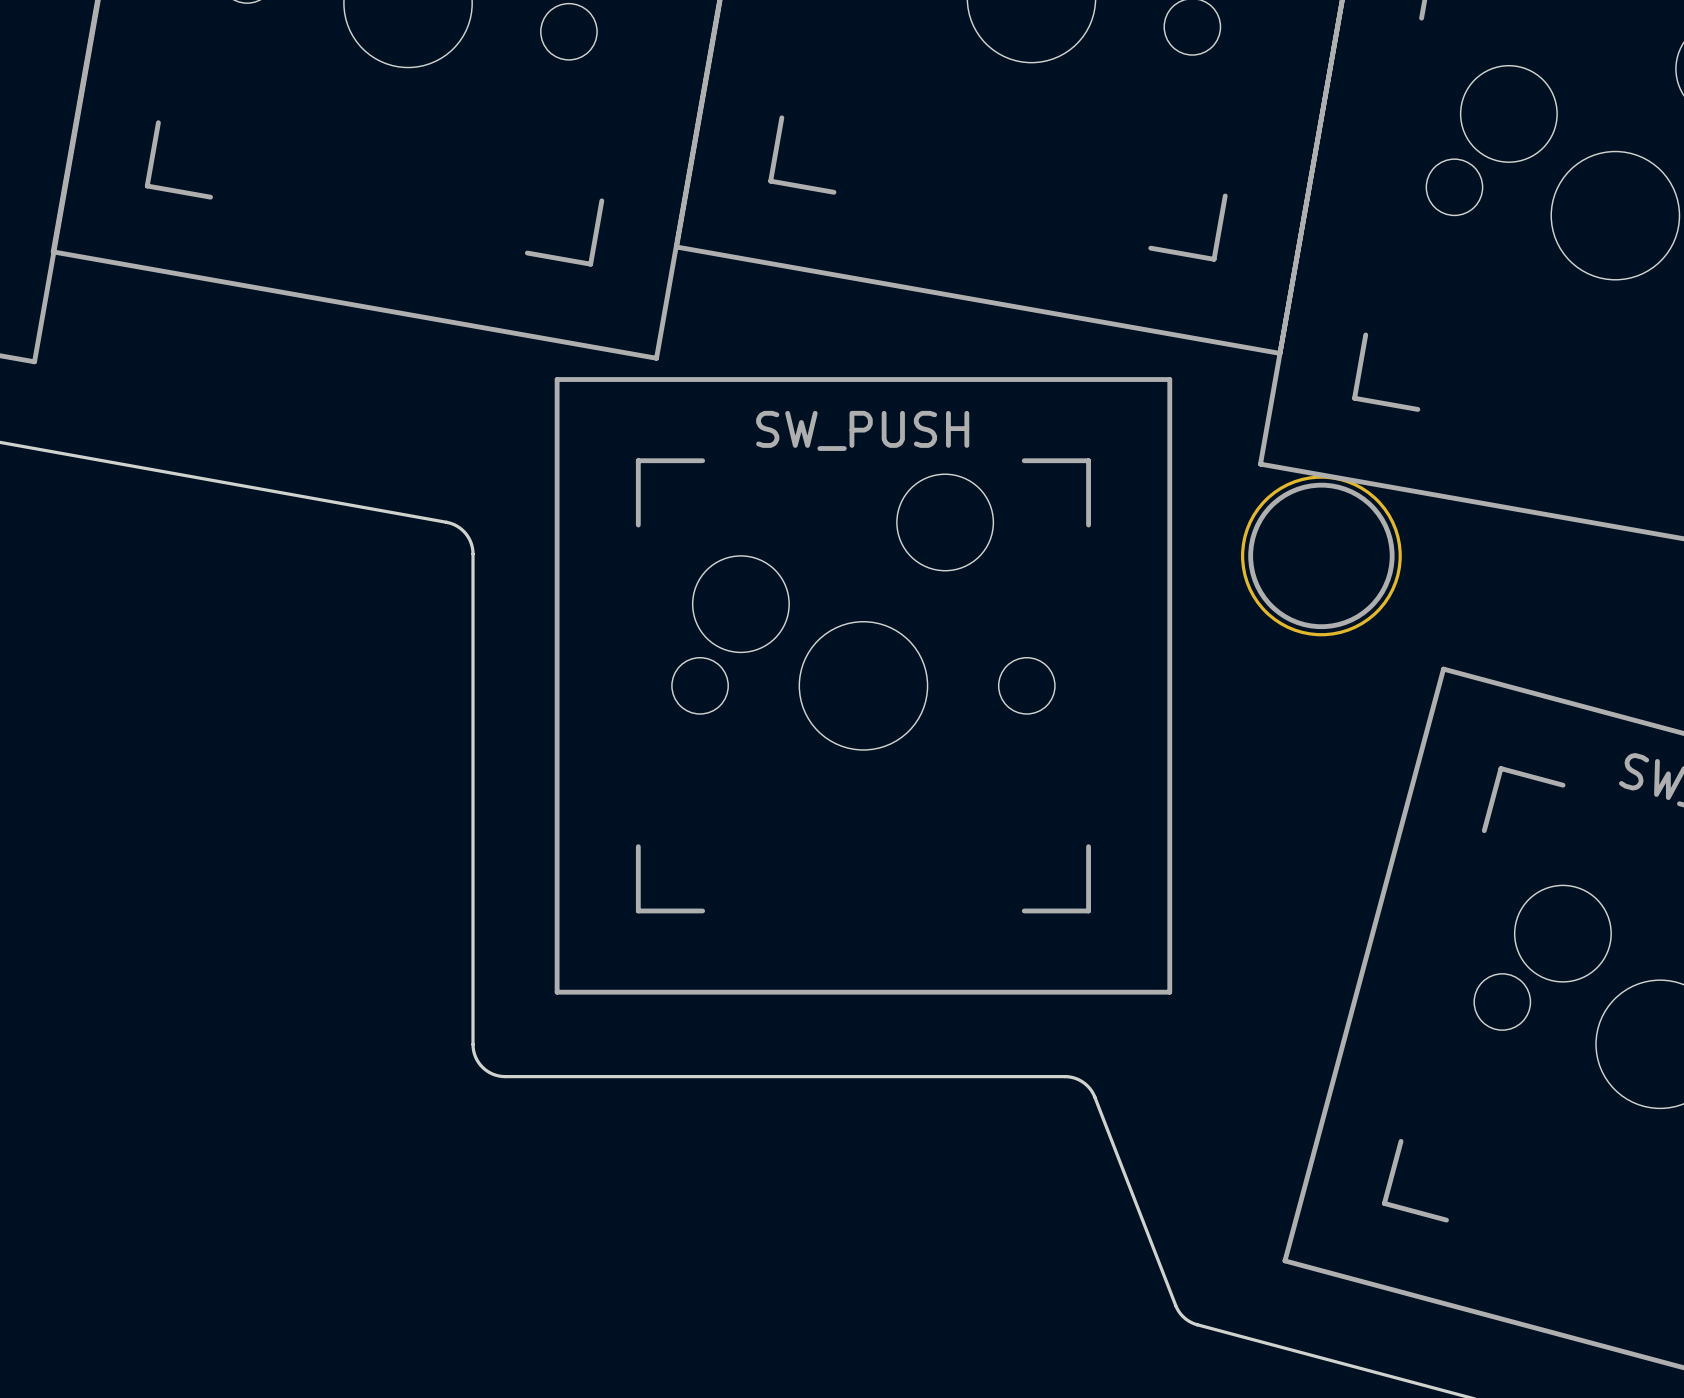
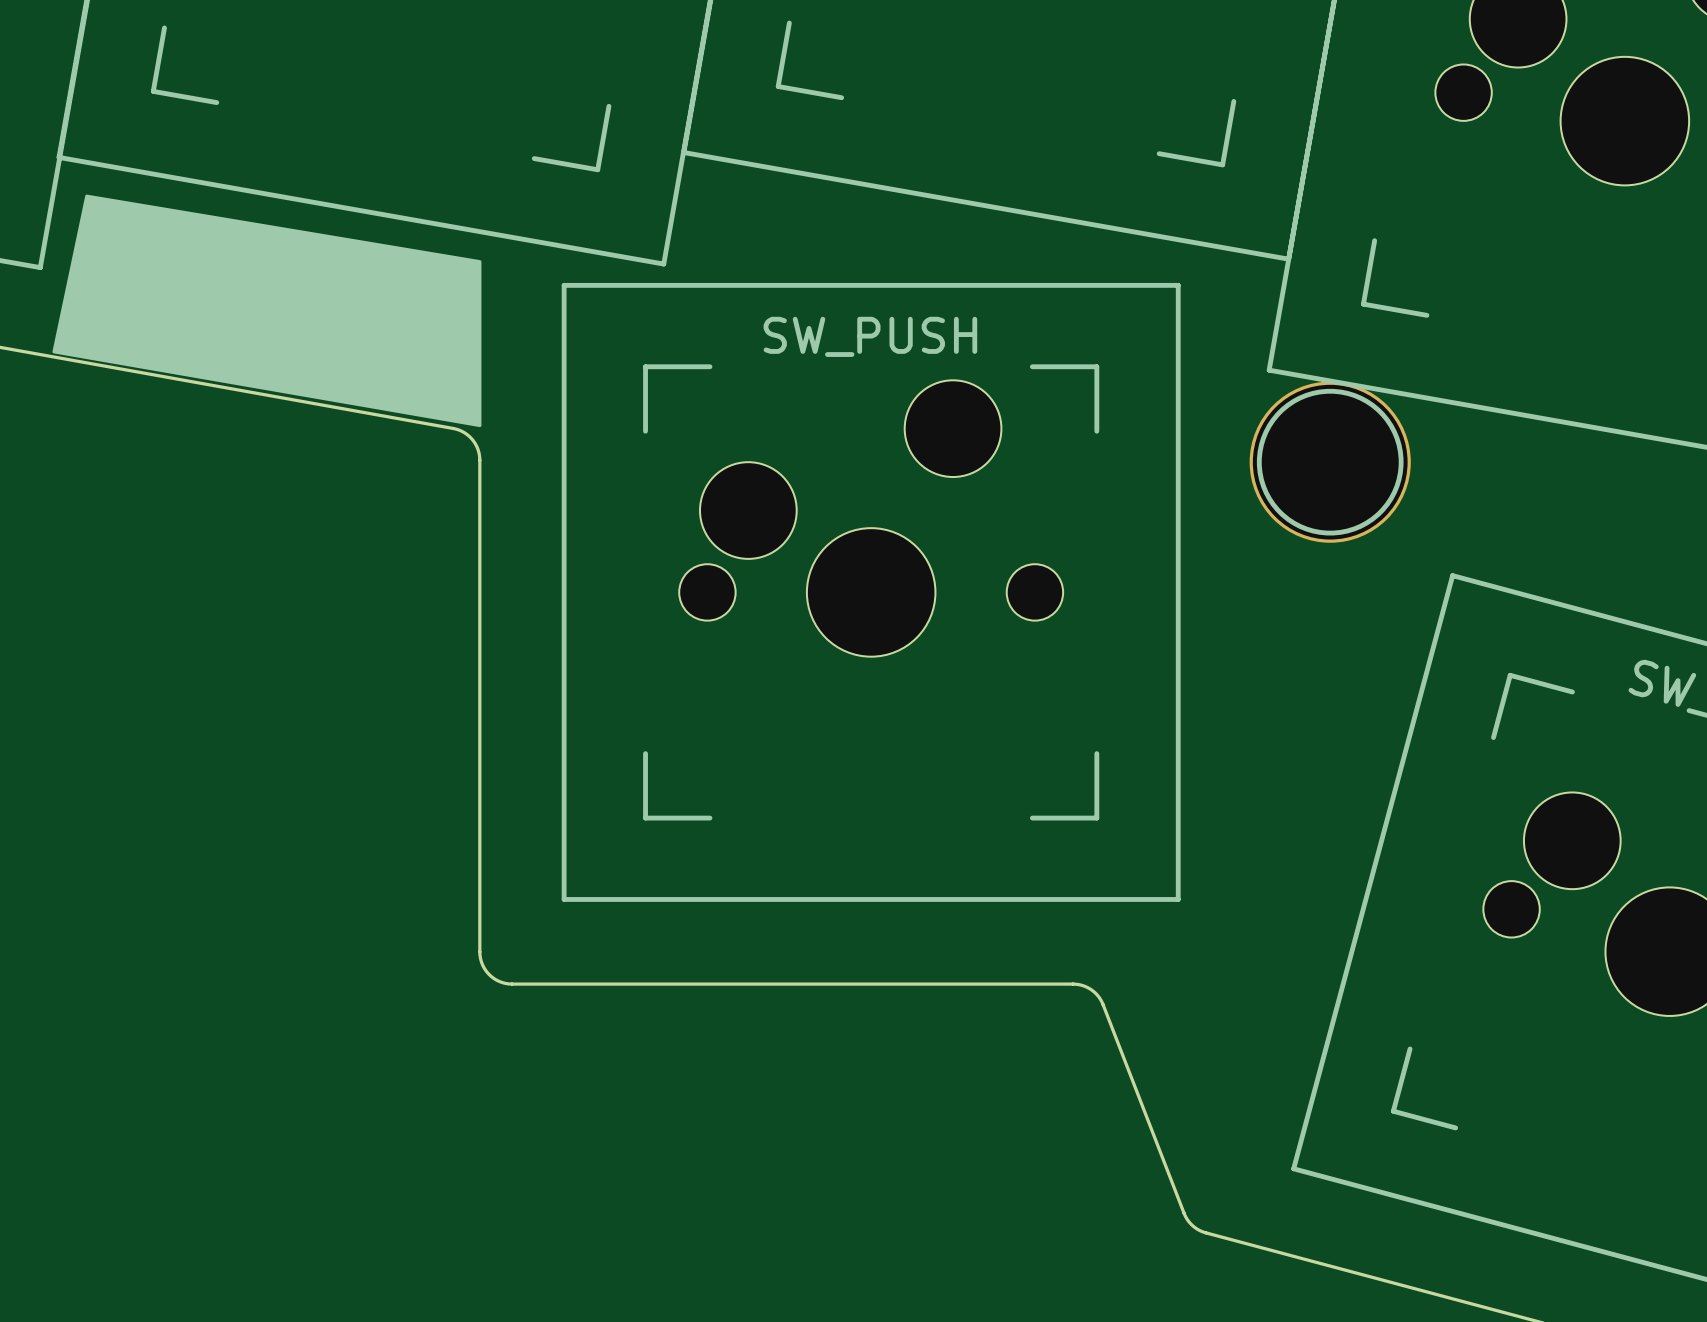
drawing: none -> [52, 194, 482, 428]

